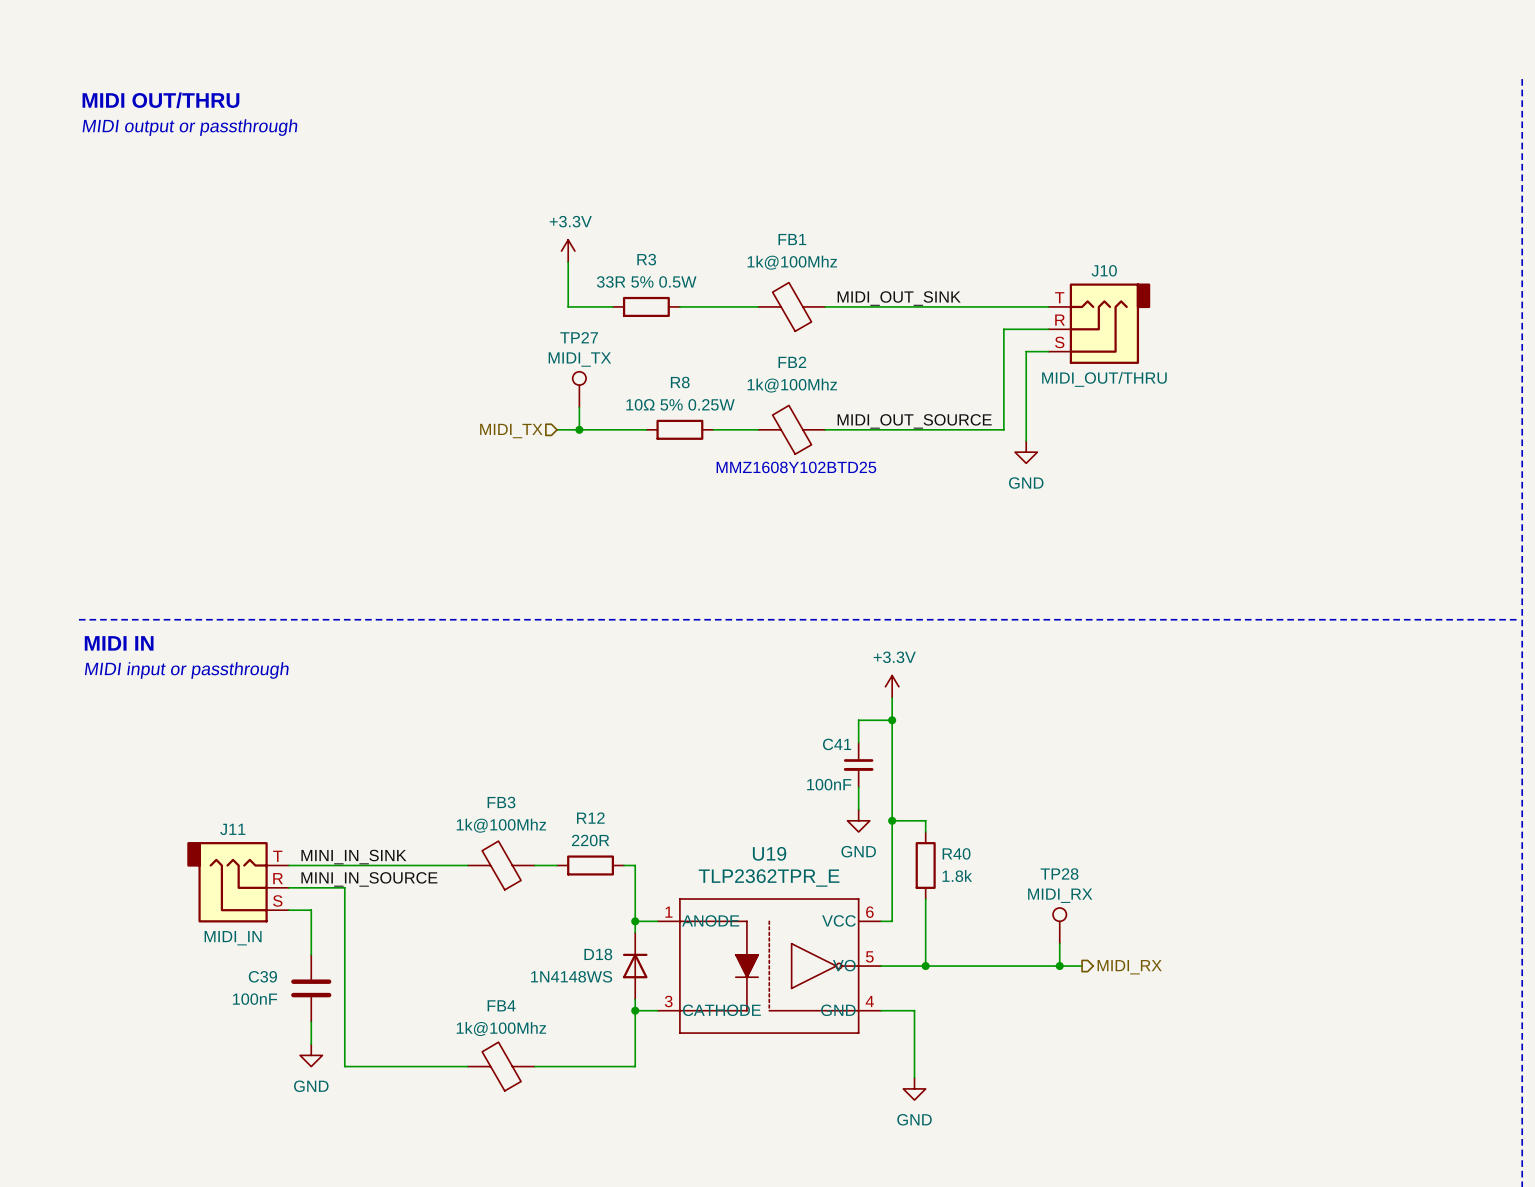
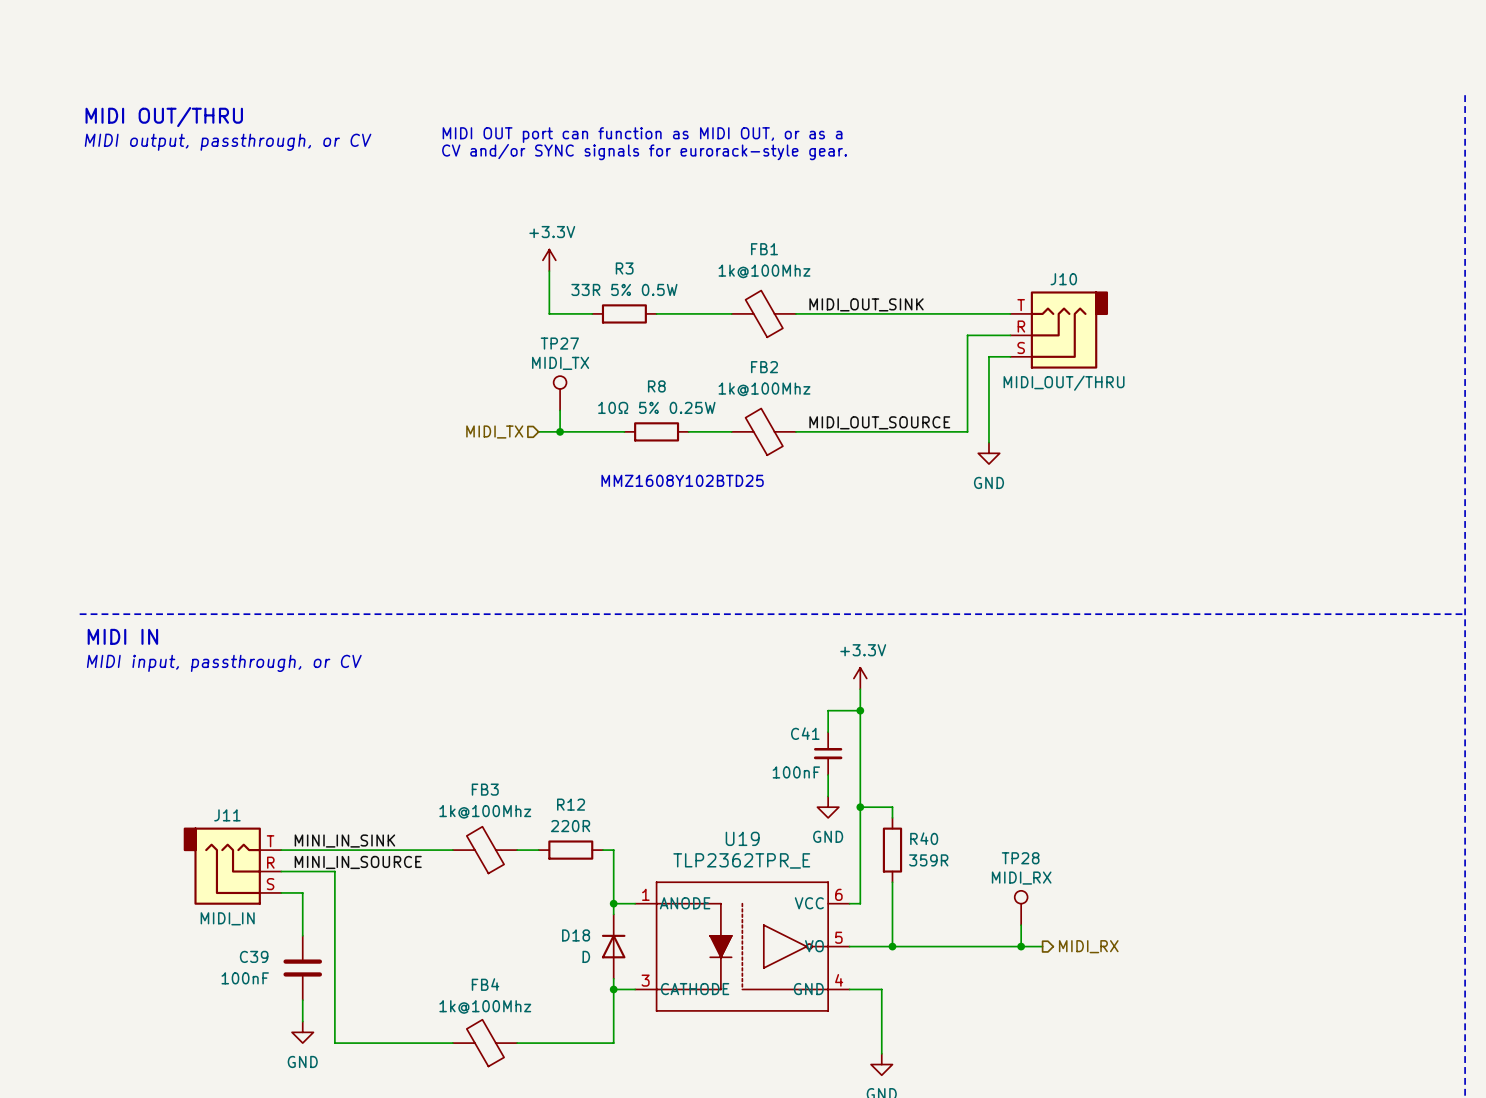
text: none -> MIDI OUT port can function as MIDI OUT, or as a (642, 135)
text: MIDI output or passthrough (190, 127) -> MIDI output, passthrough, or CV (228, 142)
text: none -> CV and/or SYNC signals for eurorack-style gear. (644, 152)
text position: MMZ1608Y102BTD25 (796, 467) -> MMZ1608Y102BTD25 (682, 480)
text: MIDI input or passthrough (186, 670) -> MIDI input, passthrough, or CV (224, 663)
R40 value: 1.8k (957, 876) -> 359R (928, 860)
D18 value: 1N4148WS (571, 976) -> D (586, 956)

